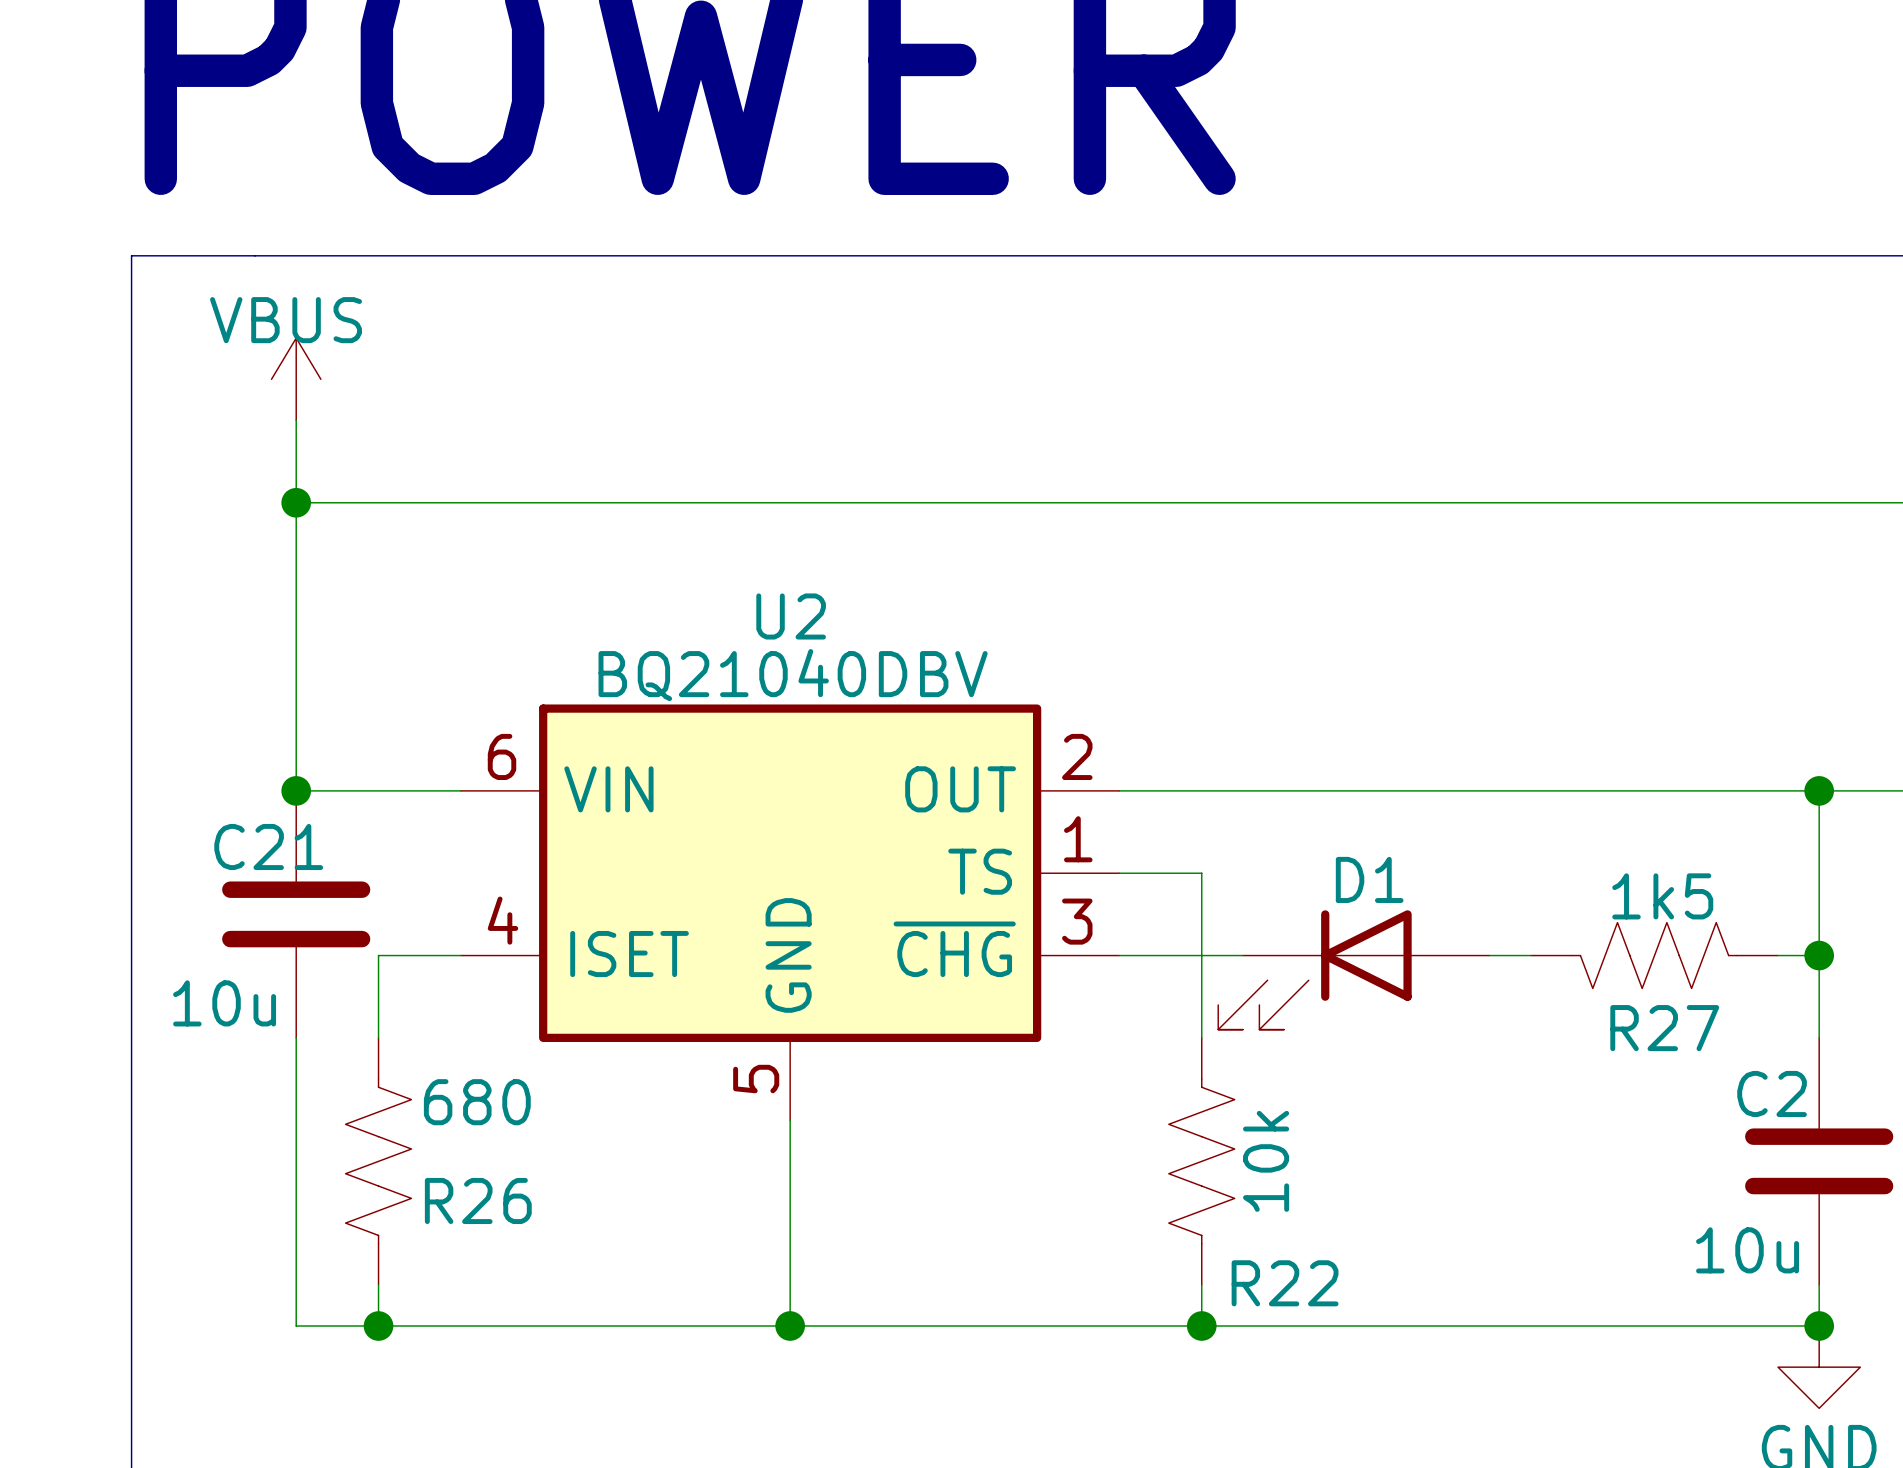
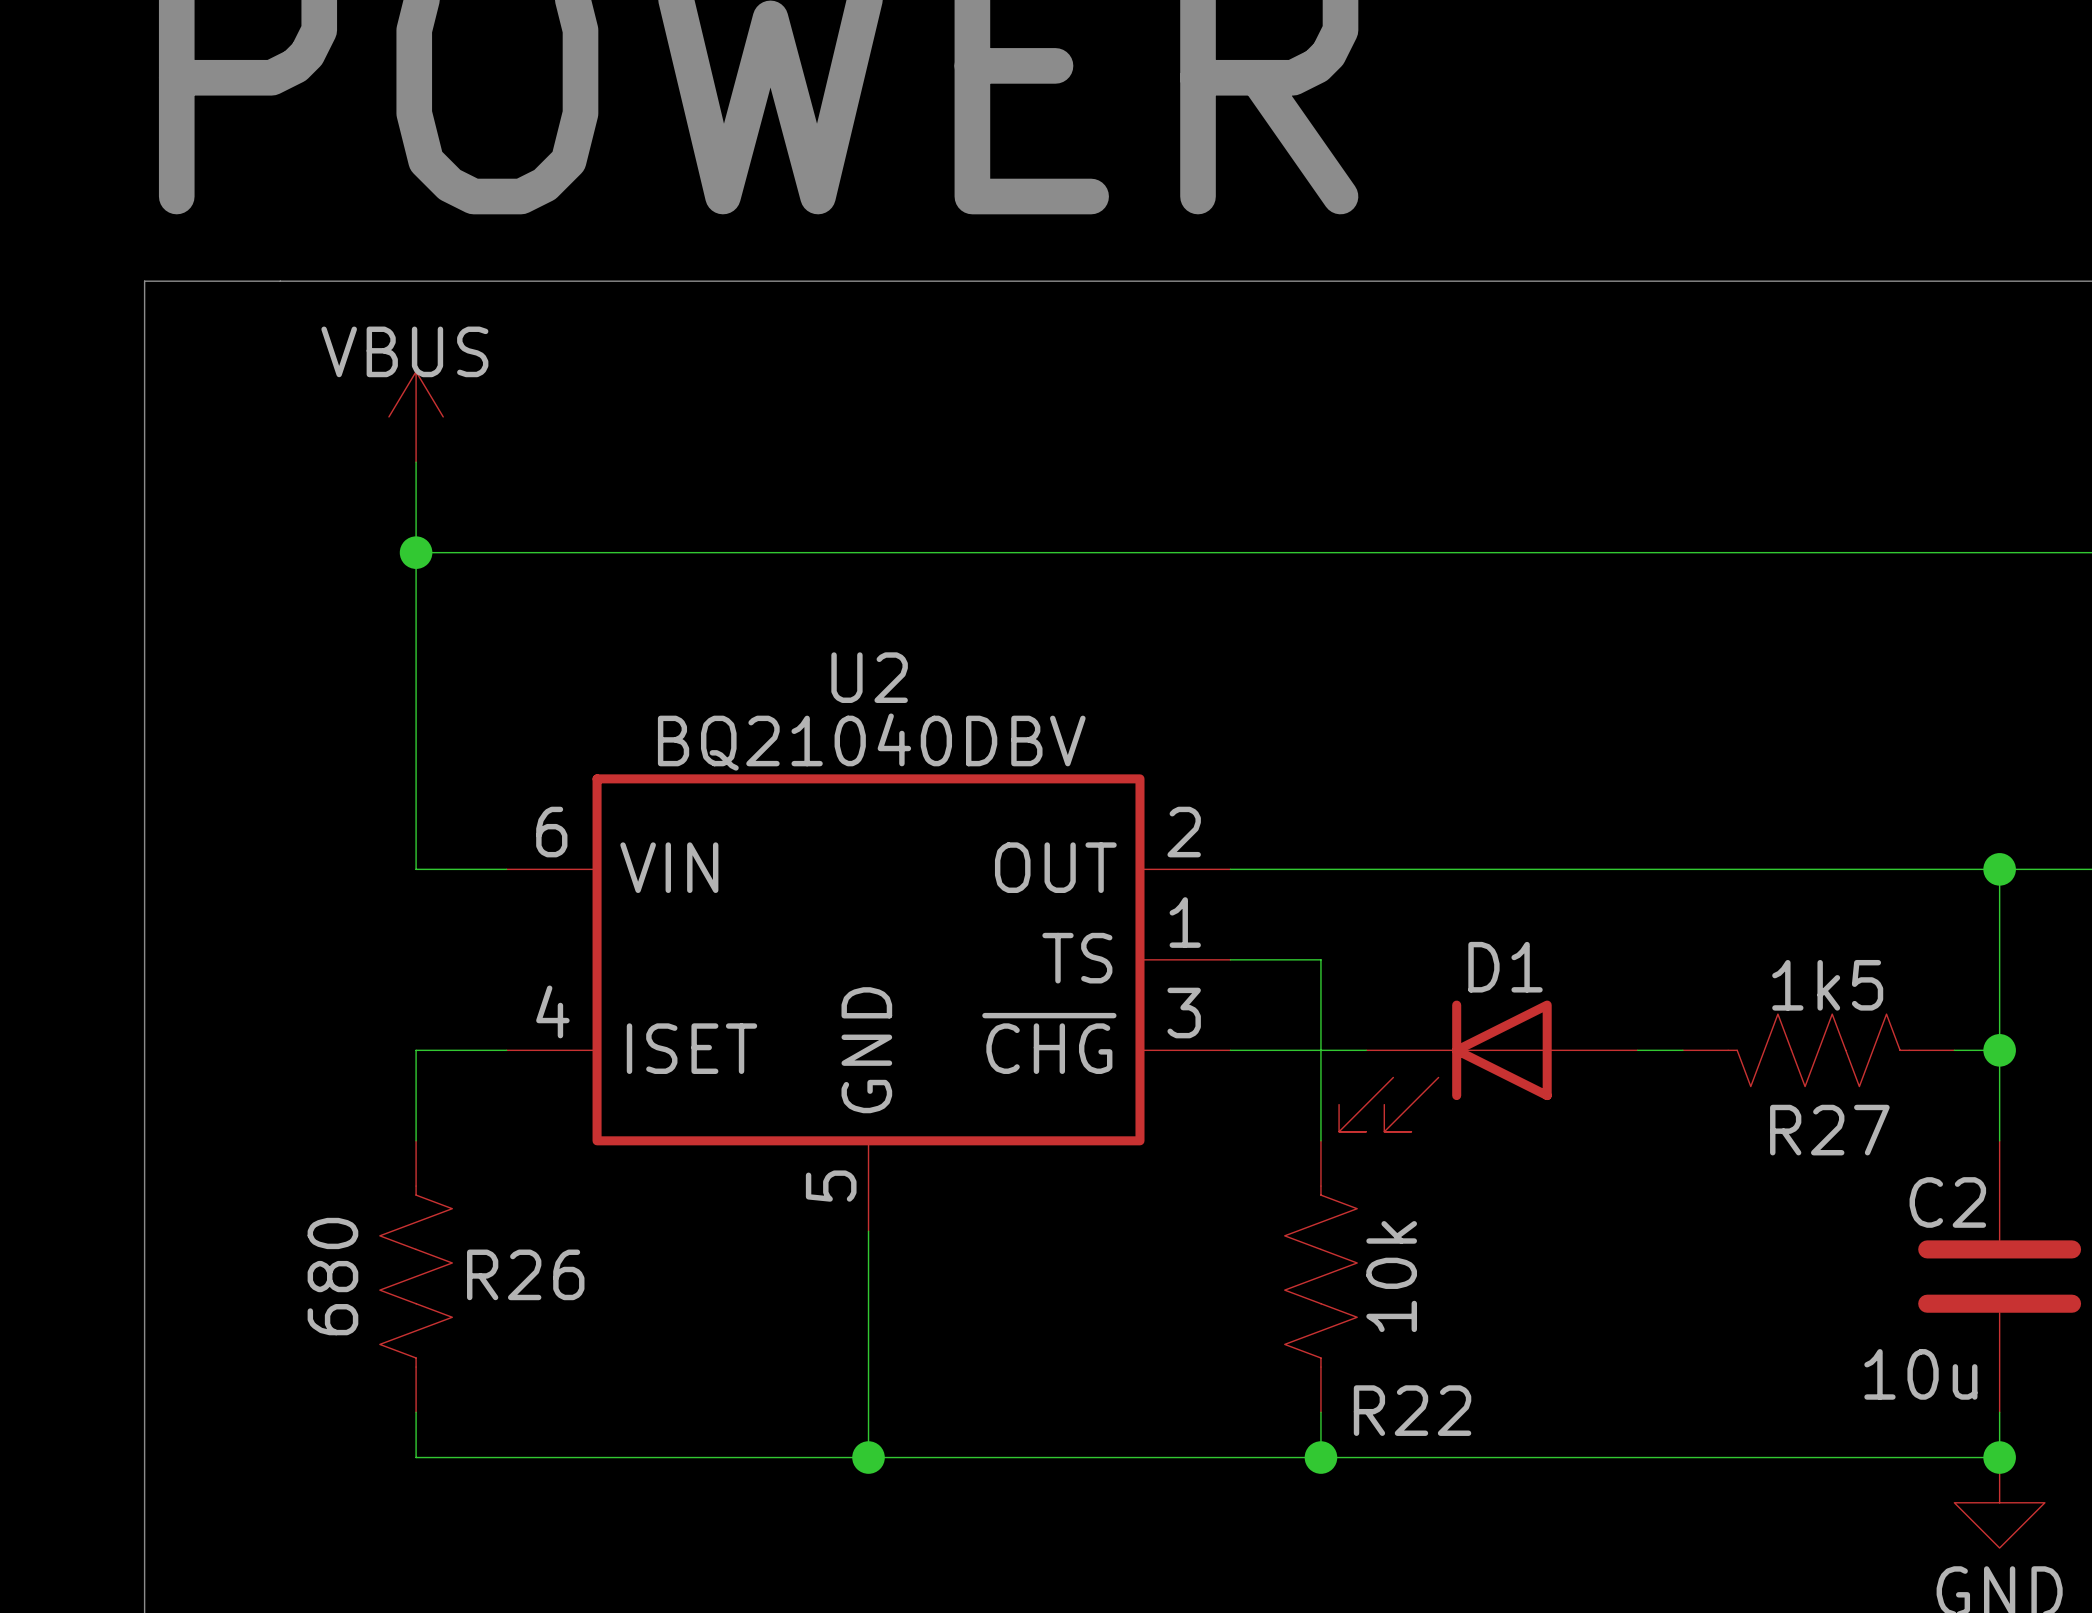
power symbol position: VBUS (296, 379) -> VBUS (416, 416)
wire: (296, 420) (296, 790) (378, 790) -> (416, 462) (416, 869)
wire: (296, 502) (378, 502) -> none
junction position: (296, 502) -> (416, 552)
junction: (296, 790) -> none
C21: 10u (296, 914) -> none
wire: (296, 1037) (296, 1326) (378, 1326) -> none
R26 value rotation: 0° (477, 1102) -> 90° counterclockwise (332, 1276)
R26 value position: 680 (477, 1102) -> 680 (332, 1276)
R26 name position: R26 (478, 1200) -> R26 (525, 1274)
junction: (378, 1326) -> none

